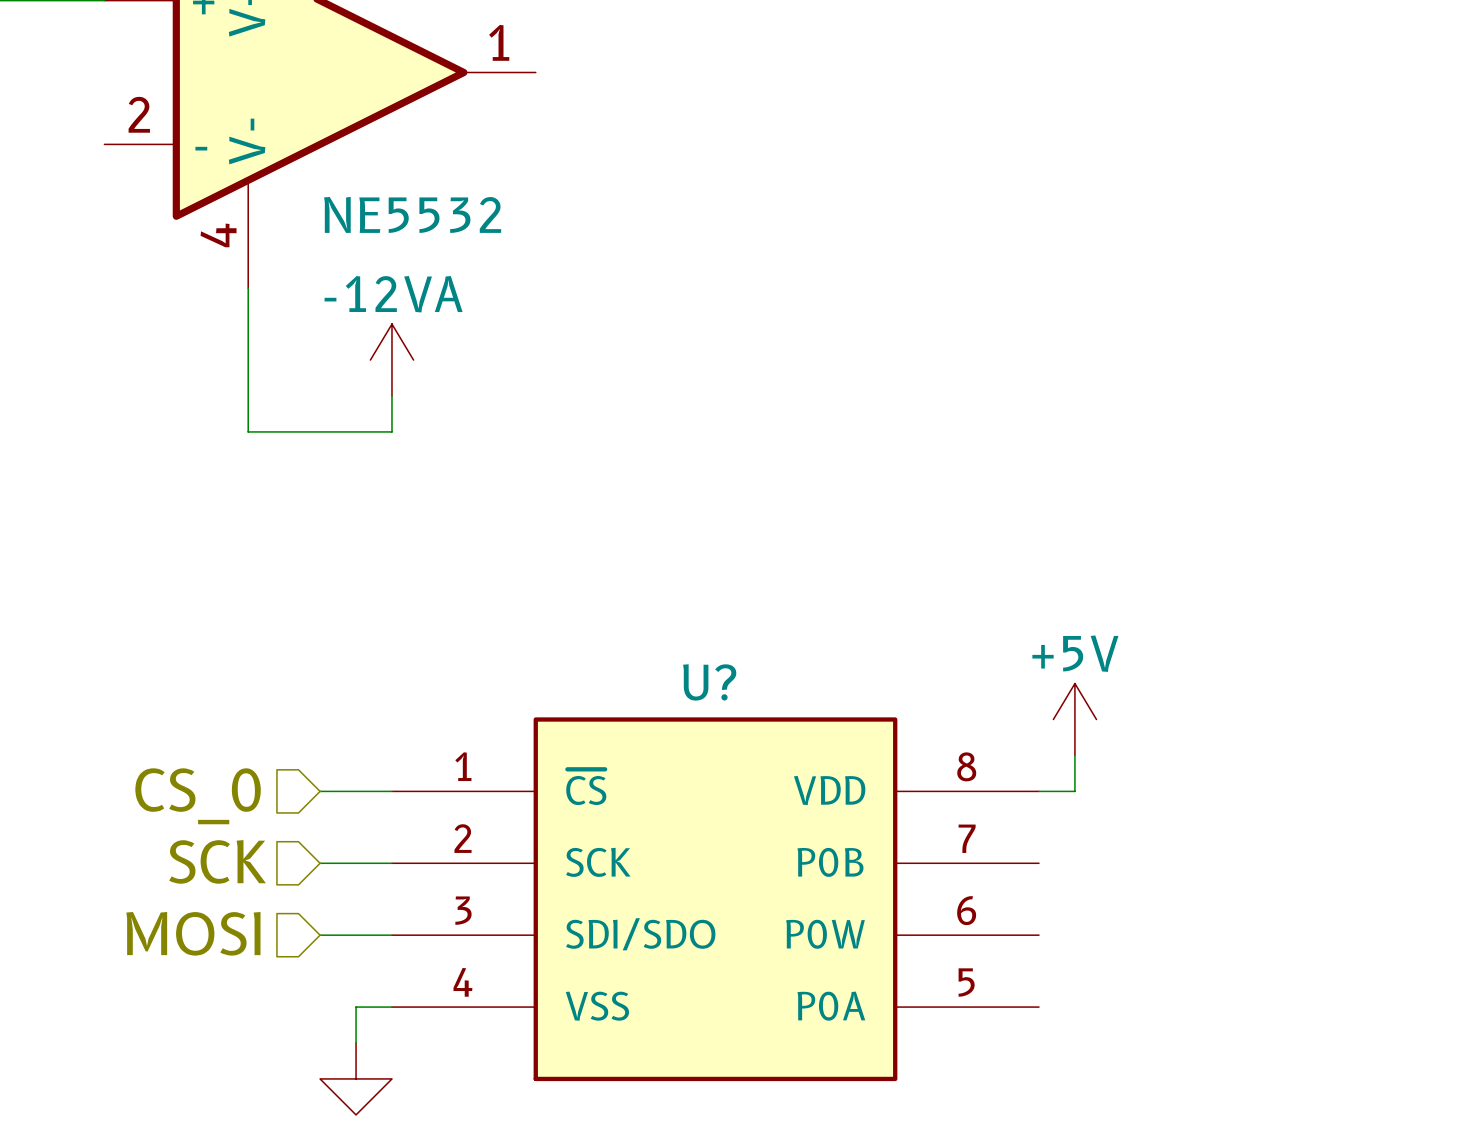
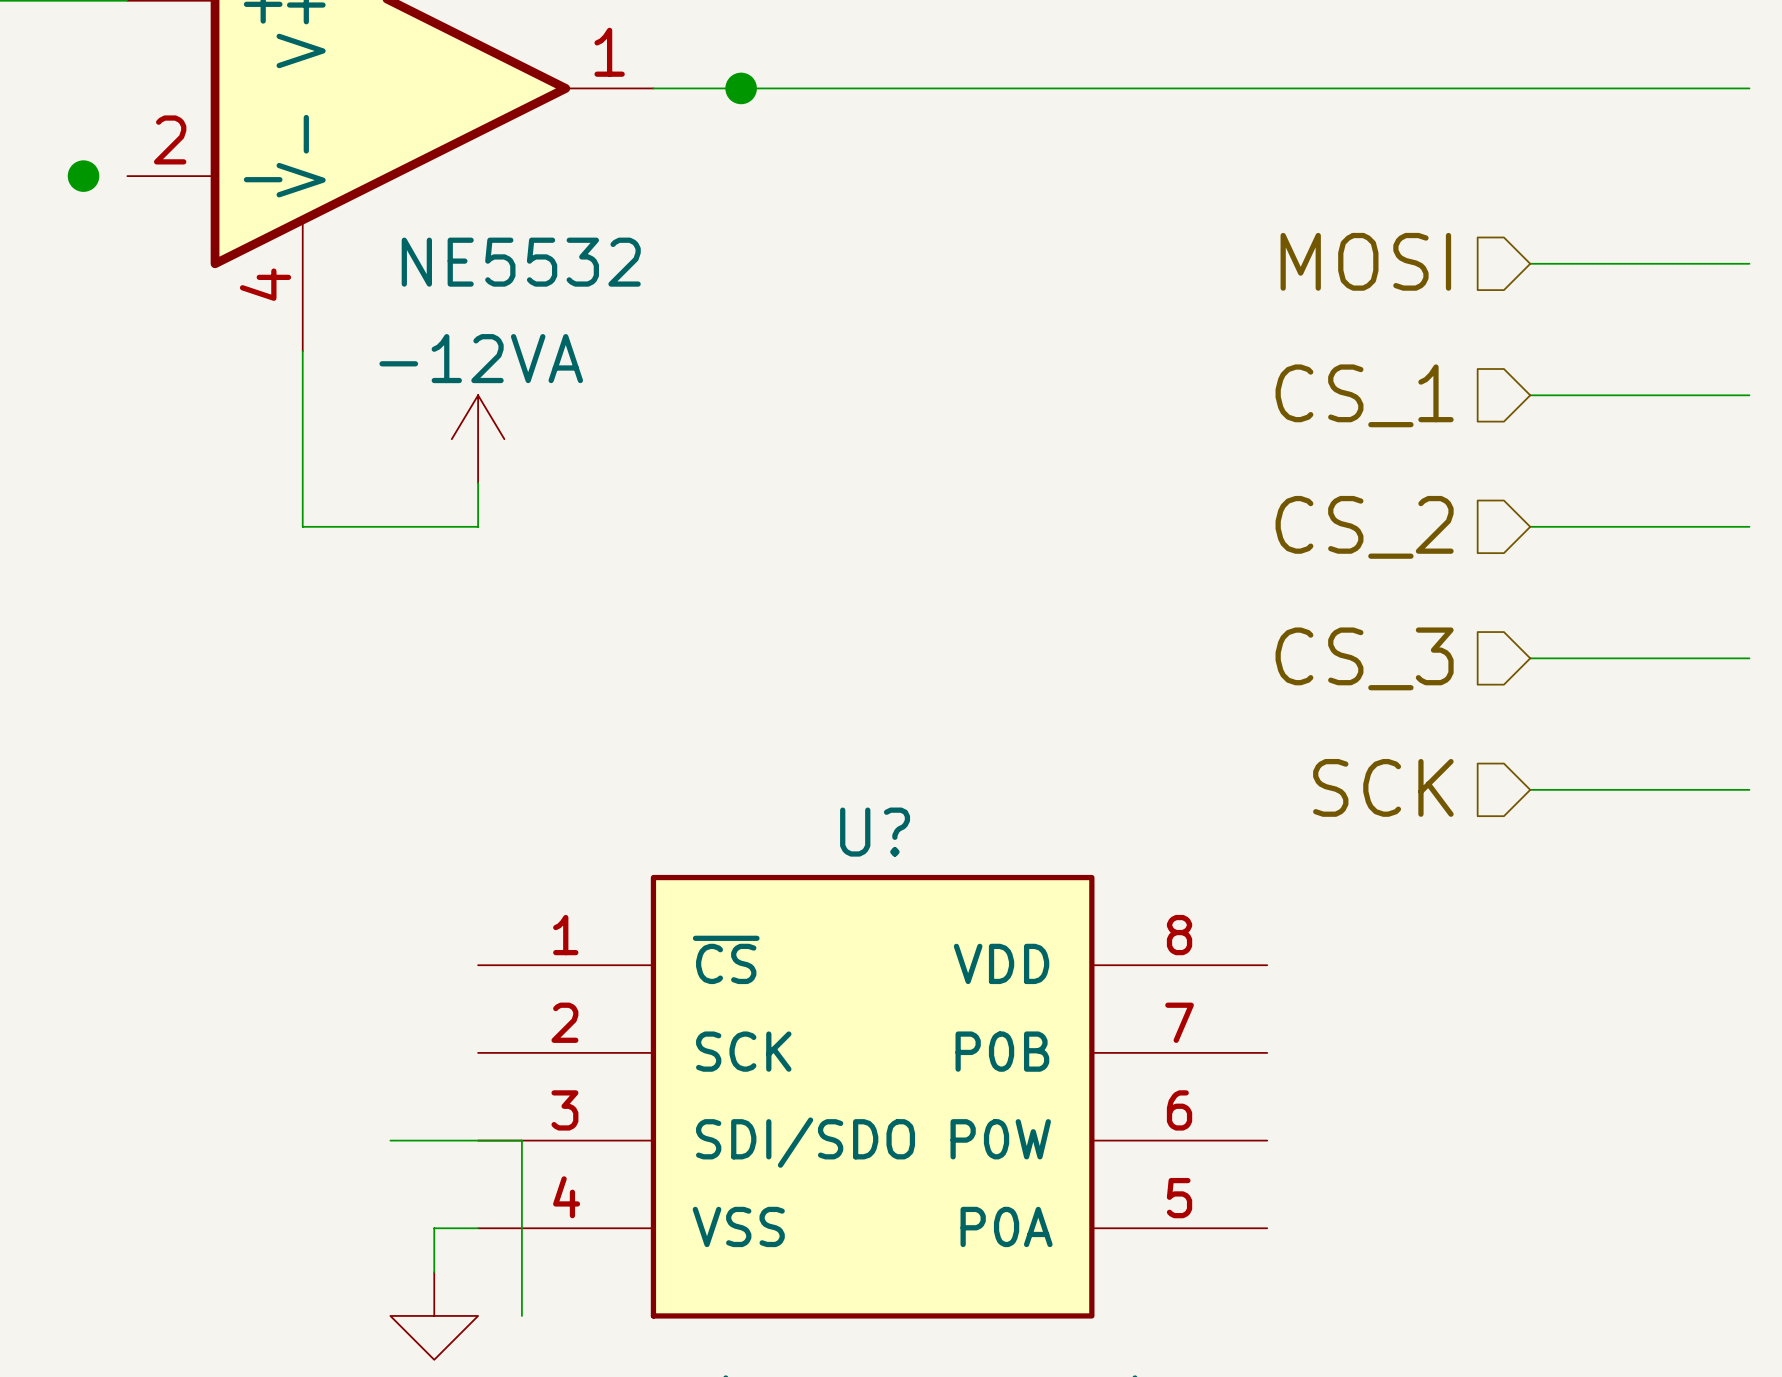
wire: none -> (653, 88) (1749, 88)
junction: none -> (741, 88)
junction: none -> (83, 176)
hierarchical label: none -> MOSI (1365, 261)
wire: none -> (1530, 263) (1749, 263)
wire: none -> (1530, 395) (1749, 395)
hierarchical label: none -> CS_1 (1364, 395)
wire: none -> (1530, 526) (1749, 526)
hierarchical label: none -> CS_2 (1364, 527)
wire: none -> (1530, 658) (1749, 658)
hierarchical label: none -> CS_3 (1364, 658)
hierarchical label: none -> SCK (1383, 787)
wire: none -> (1530, 789) (1749, 789)
power symbol: +5V (1074, 719) -> none
wire: (1074, 755) (1074, 791) (1038, 791) -> none
wire: (320, 791) (391, 791) -> none
hierarchical label: CS_0 (198, 796) -> none
hierarchical label: SCK (217, 861) -> none
wire: (320, 863) (391, 863) -> none
hierarchical label: MOSI (193, 933) -> none
wire: none -> (478, 1140) (521, 1140) (521, 1315)

